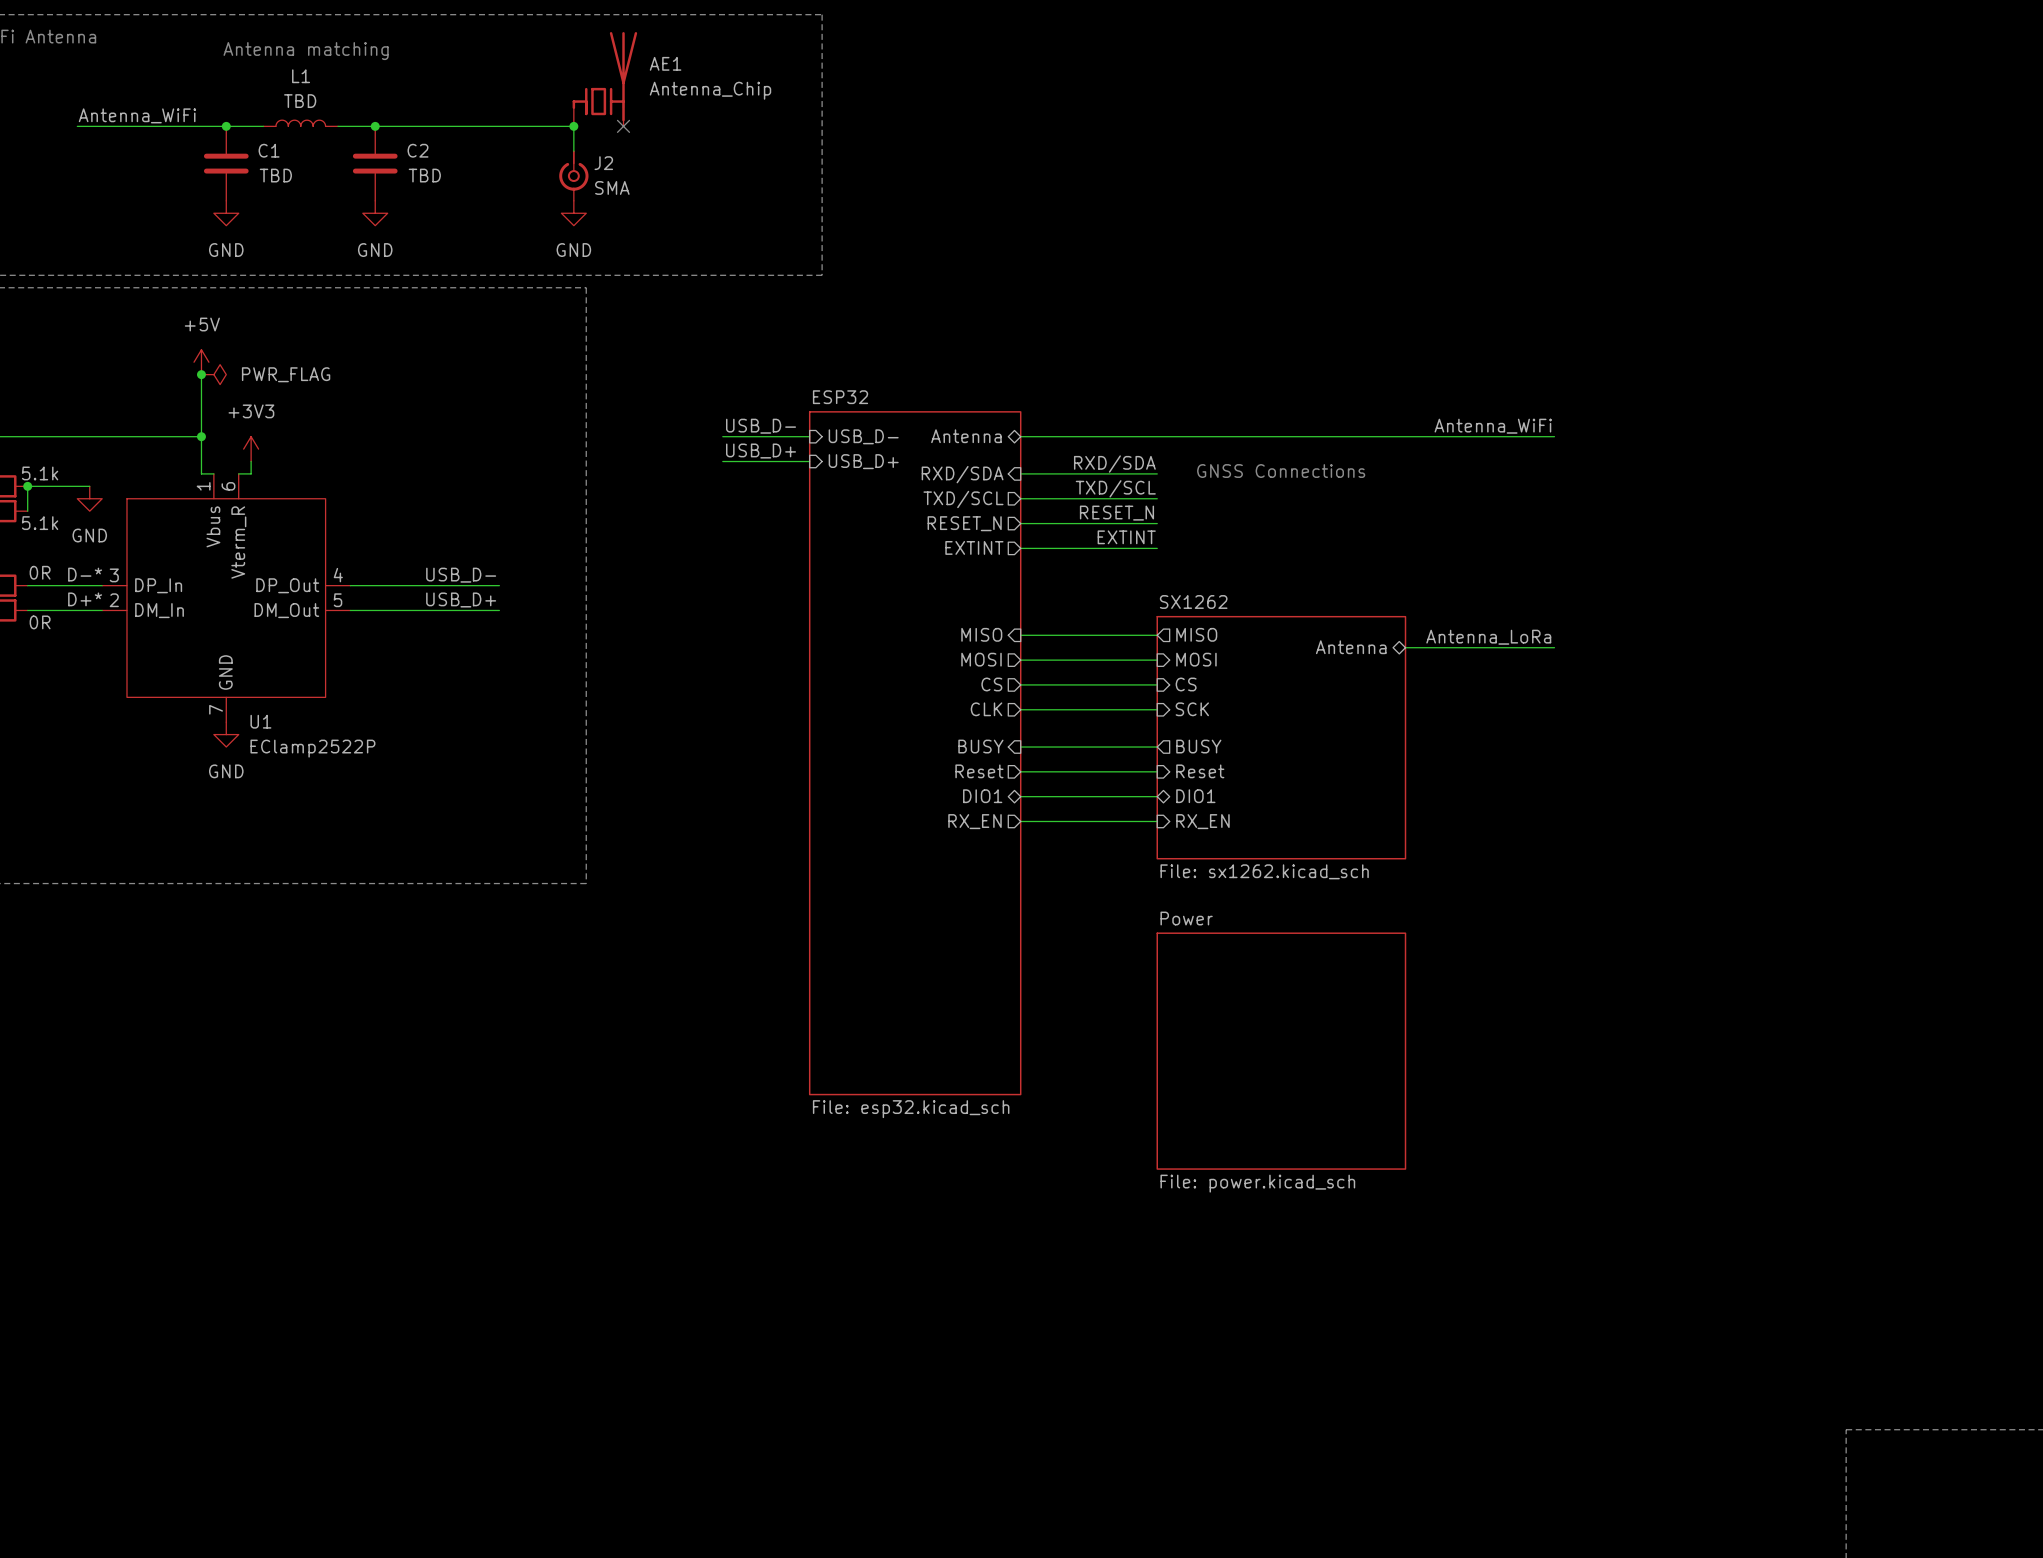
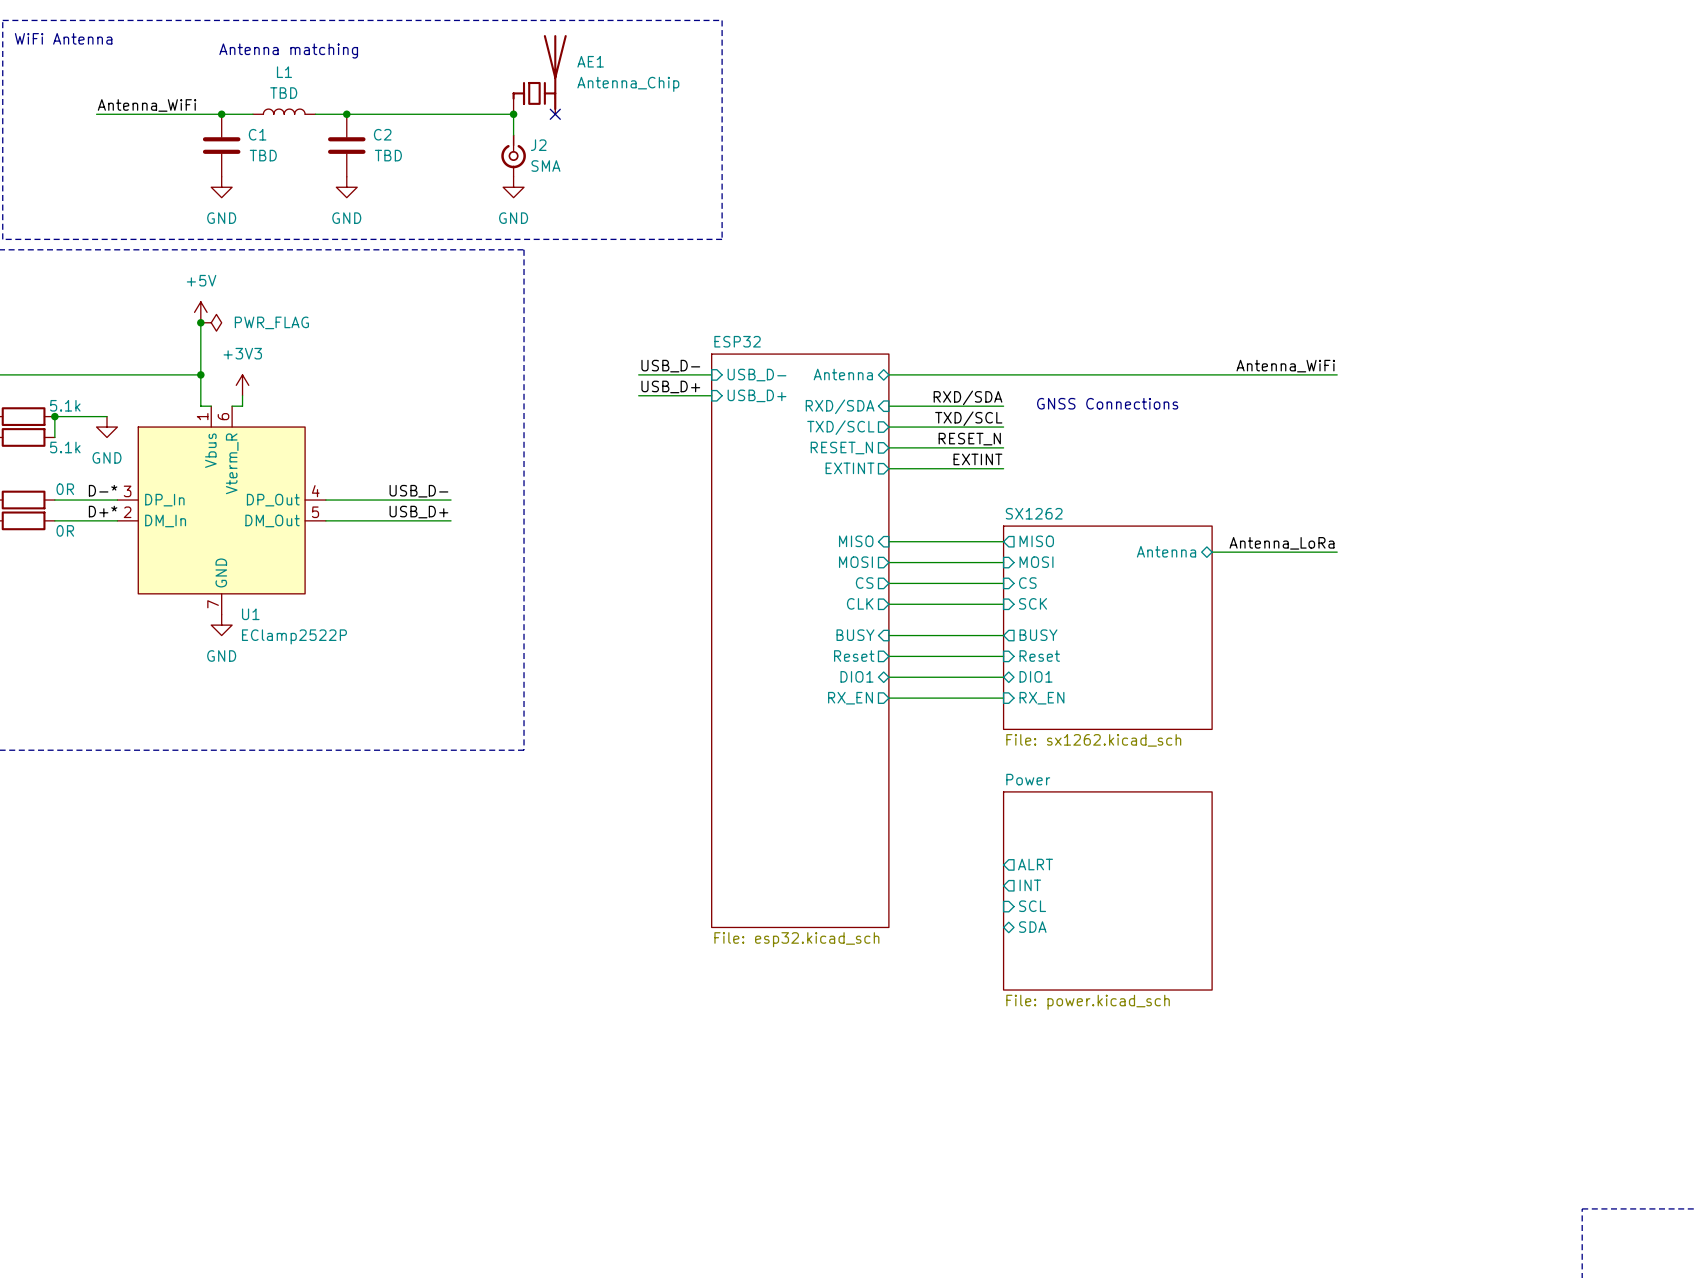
sheet pin: none -> ALRT (1035, 864)
sheet pin: none -> INT (1030, 885)
sheet pin: none -> SCL (1032, 906)
sheet pin: none -> SDA (1032, 927)

